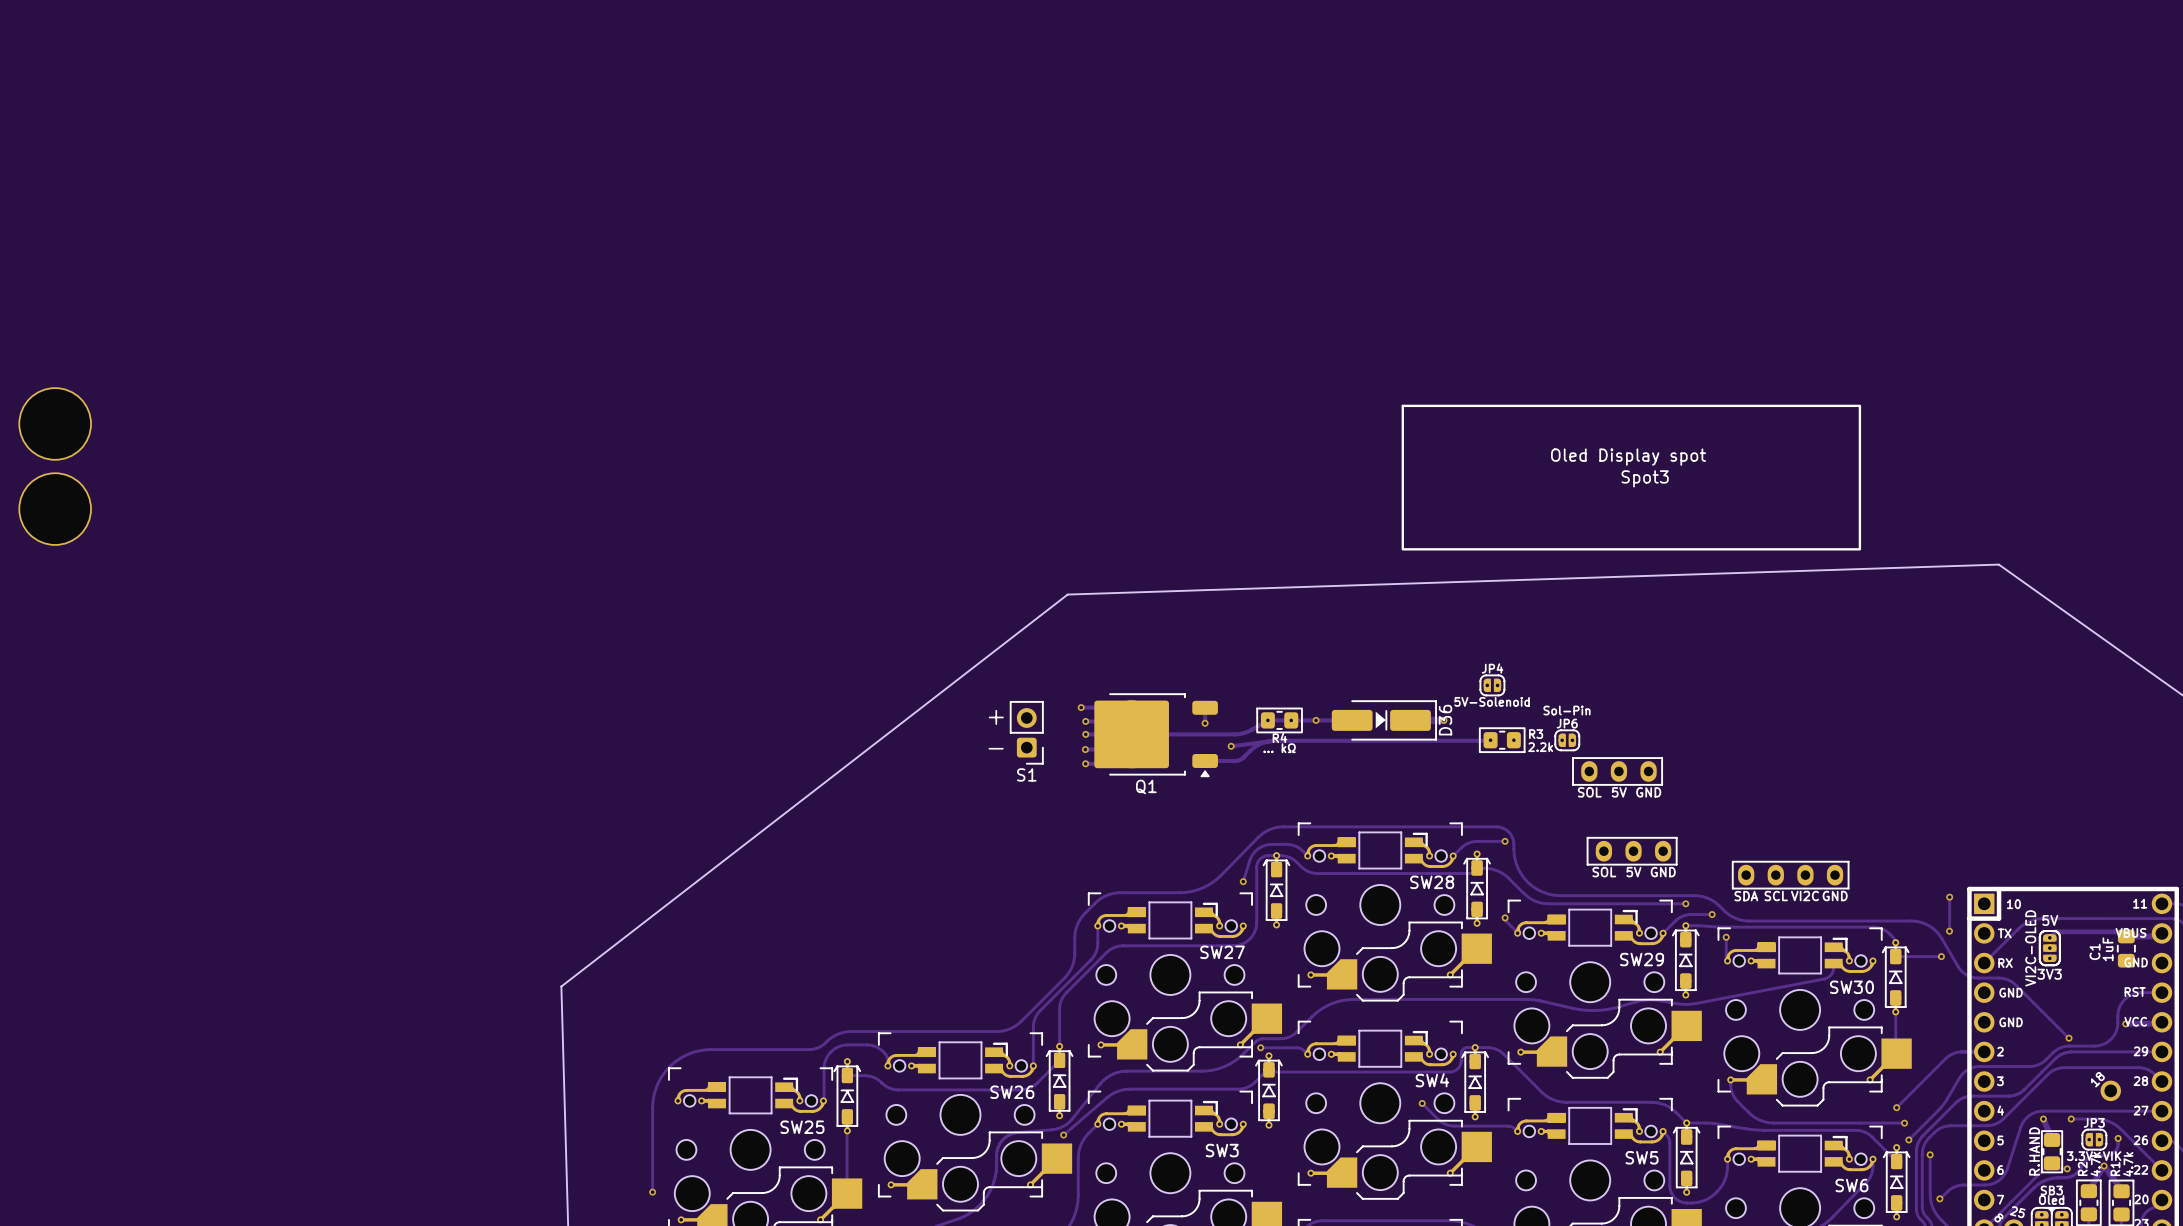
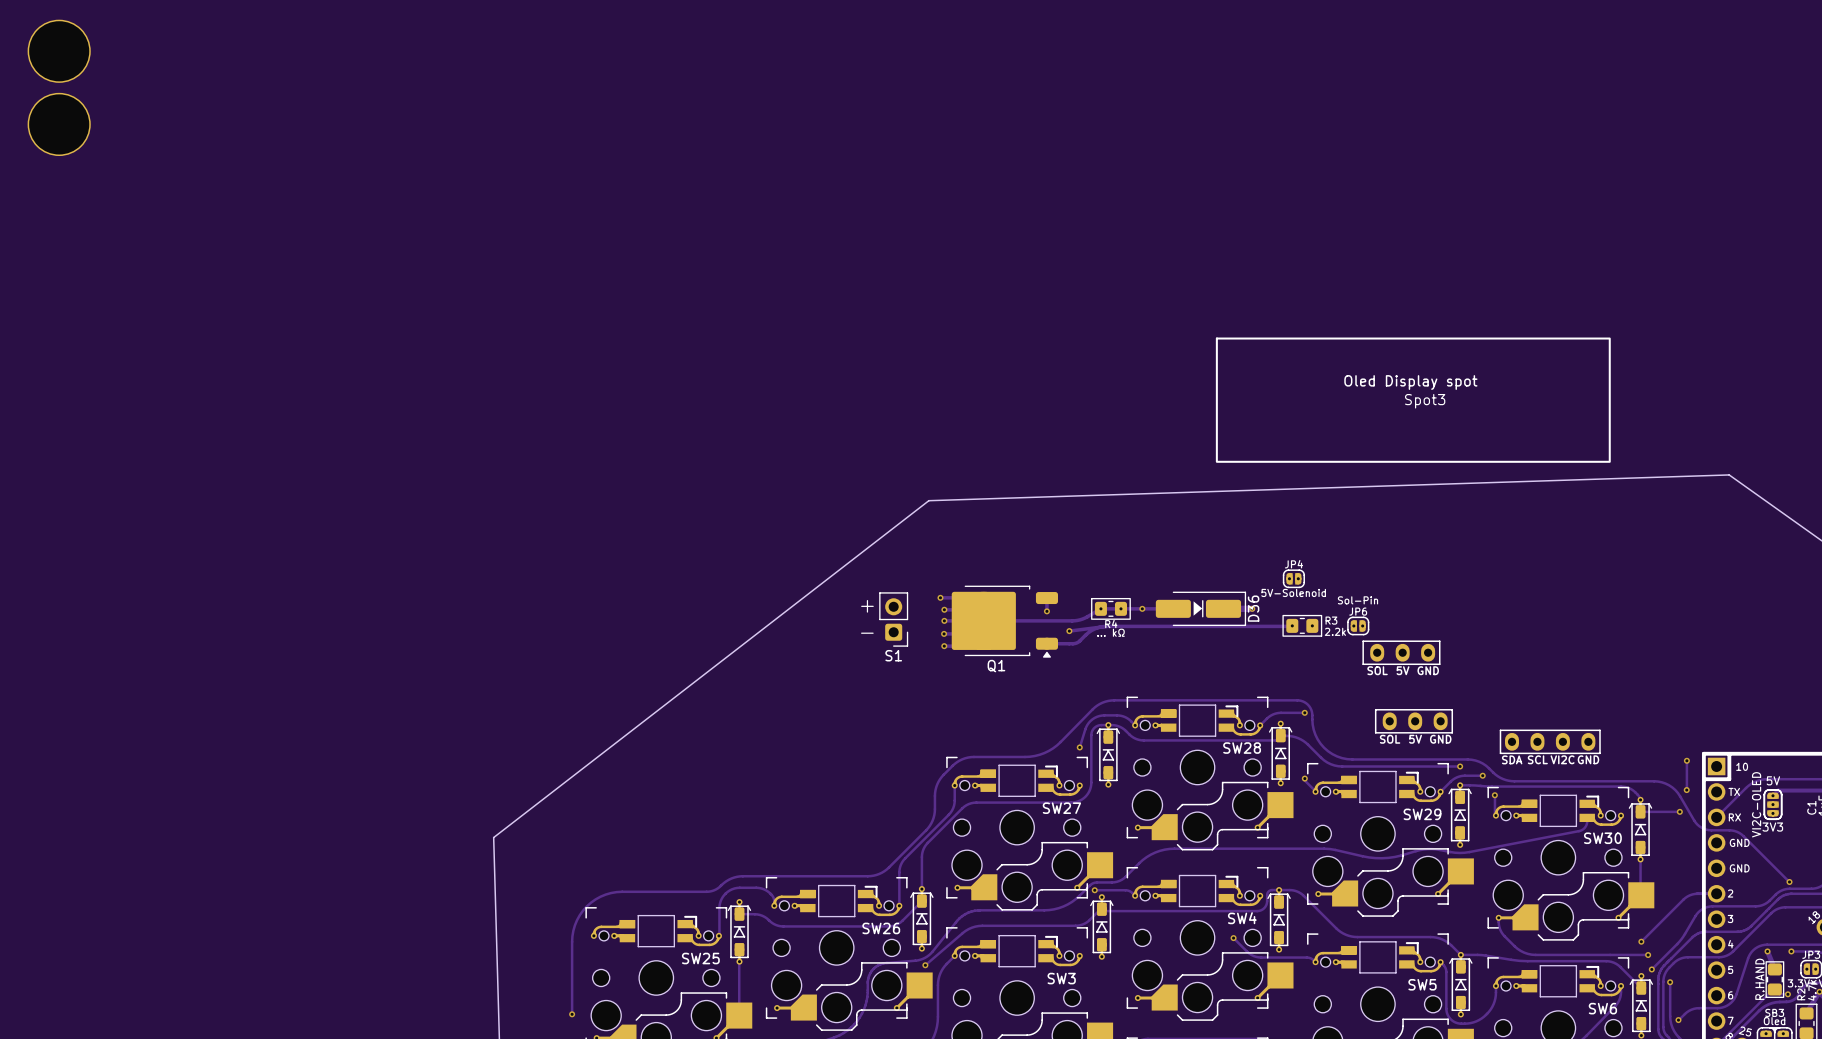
part: none -> (59, 51)
part: none -> (59, 124)
part: (55, 423) -> none
part: (55, 509) -> none

